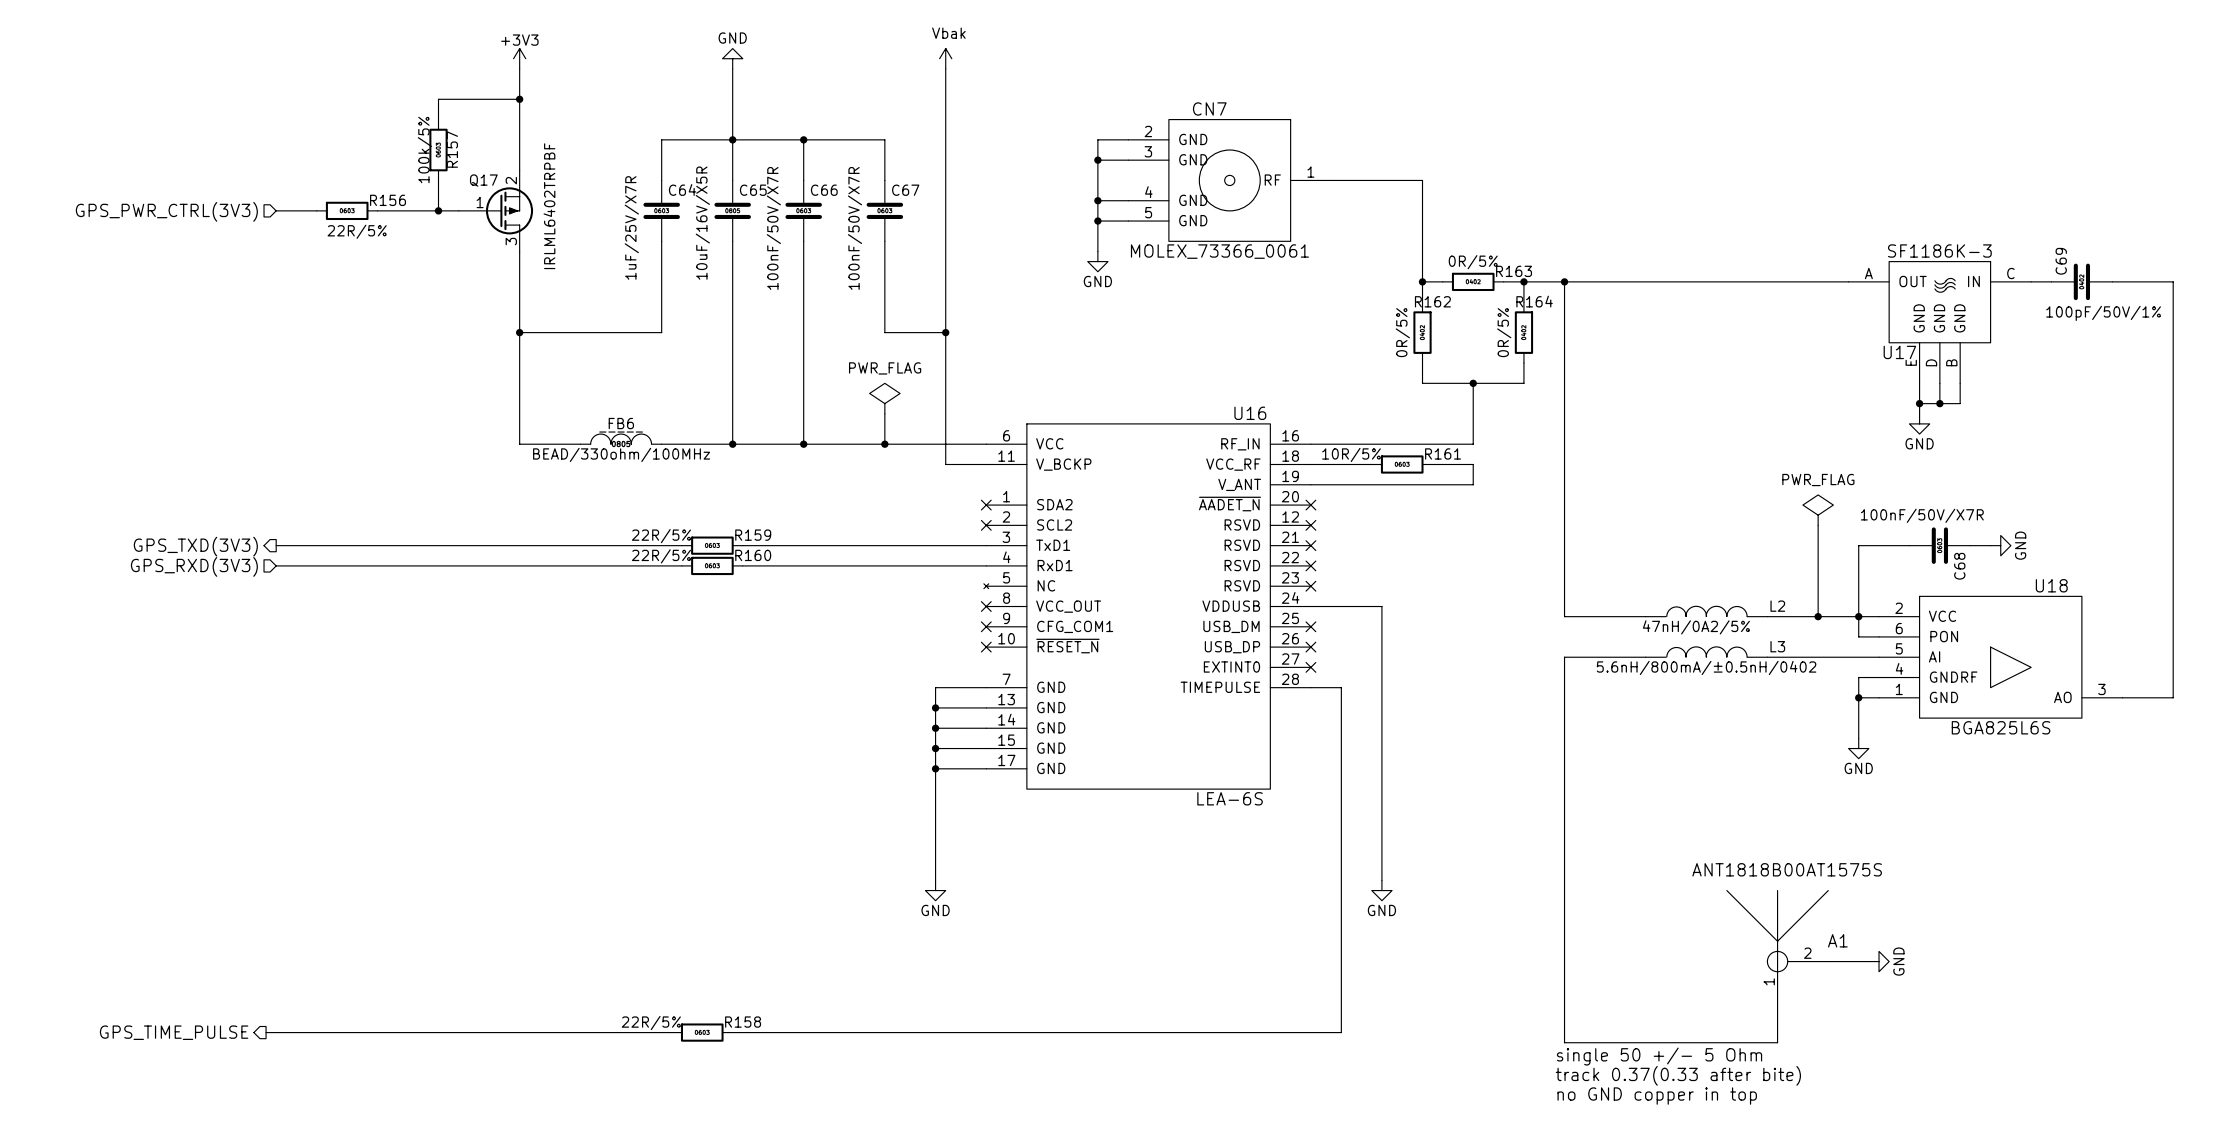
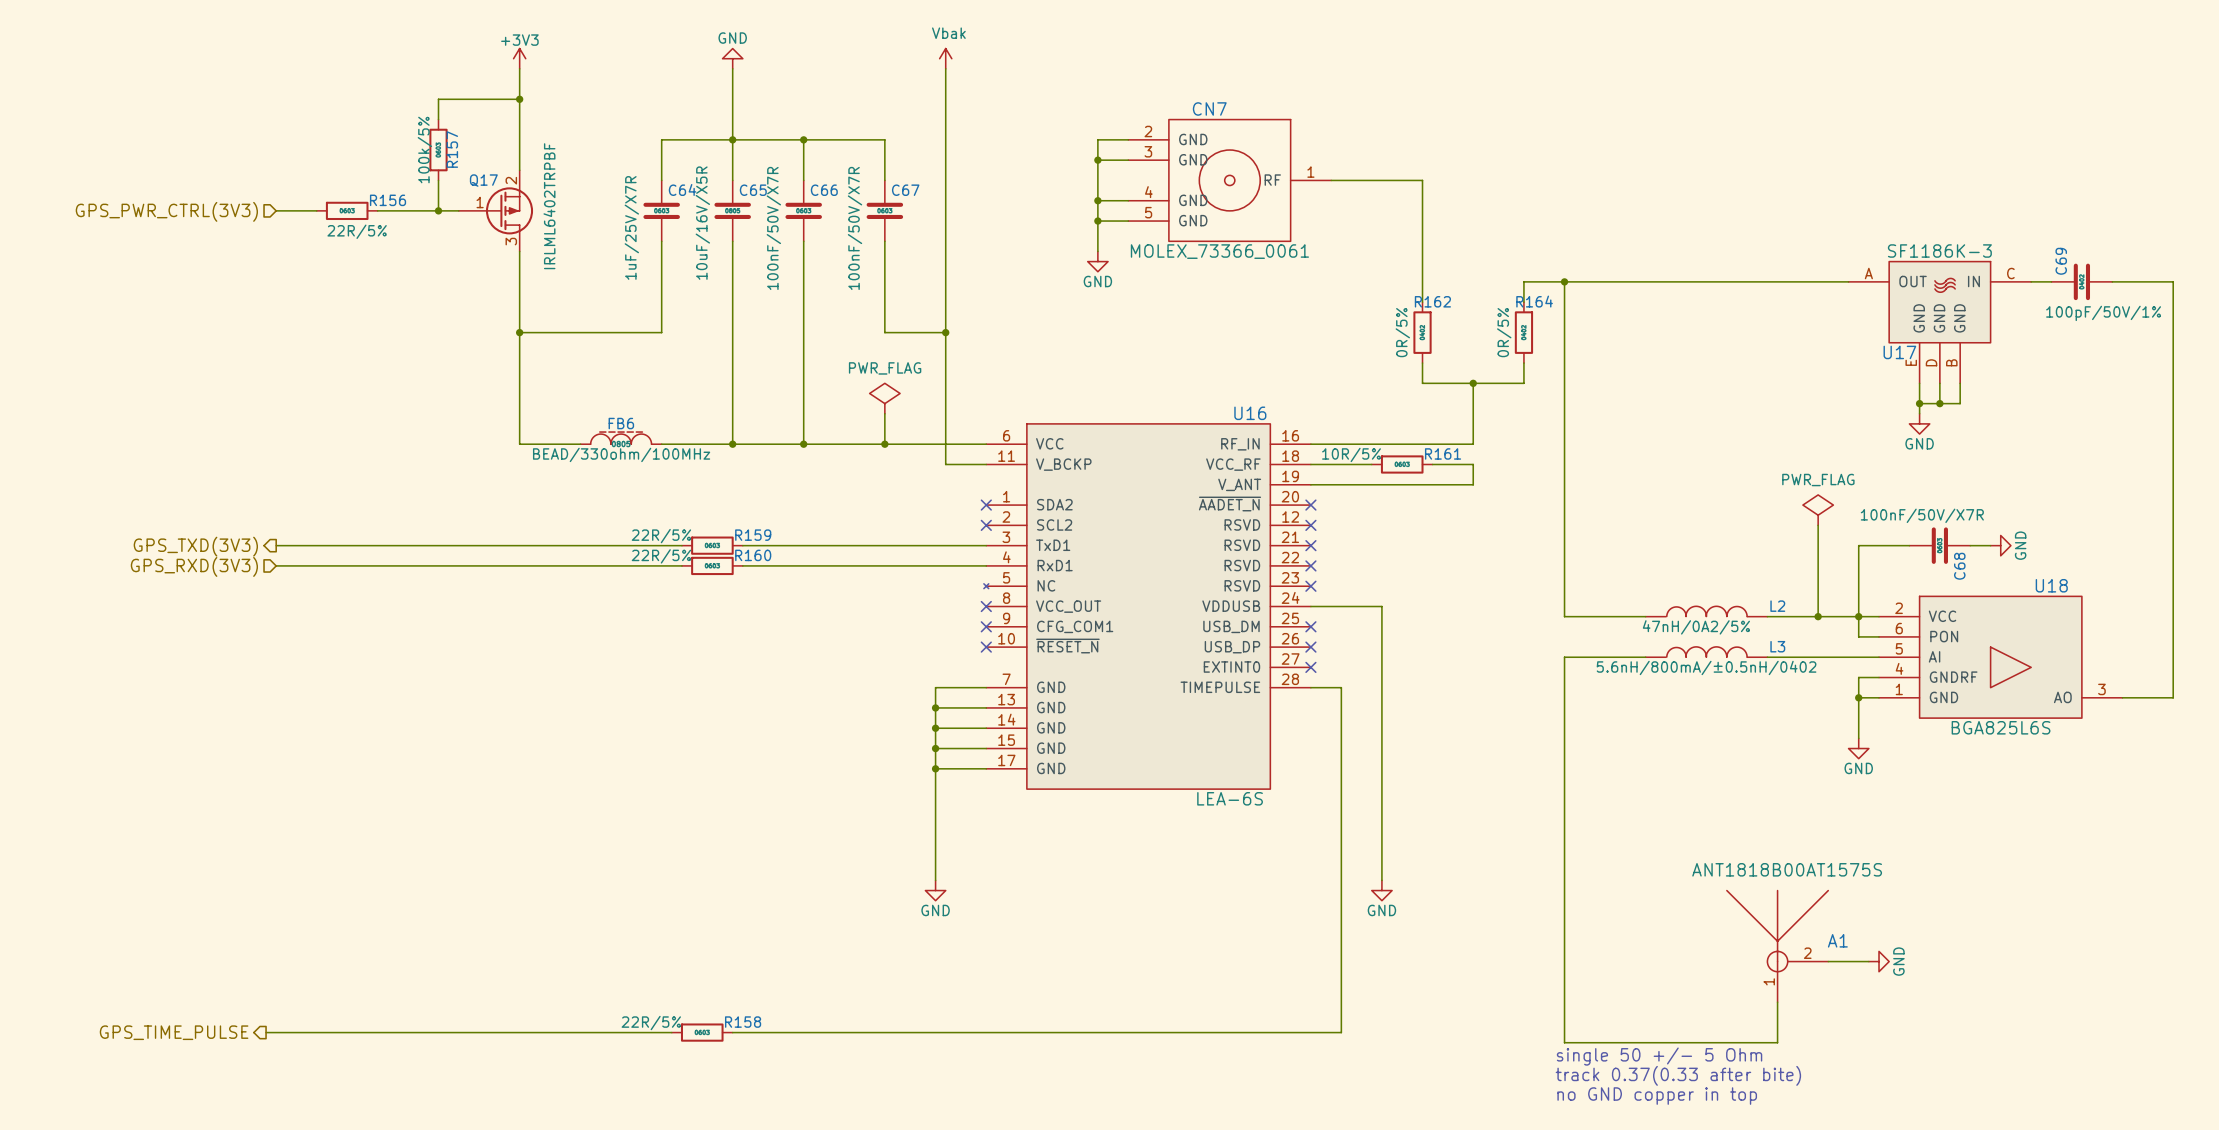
wire: (1422, 281) (1442, 281) -> none
junction: (1422, 281) -> none
R163: 0R/5% (1473, 281) -> none
wire: (1503, 281) (1523, 281) -> none
junction: (1523, 281) -> none

